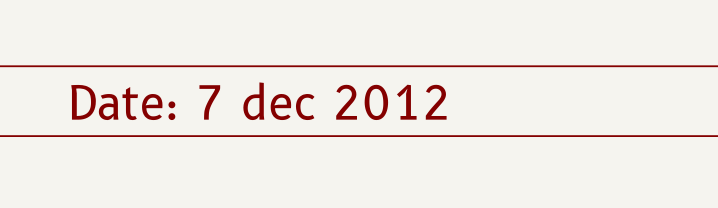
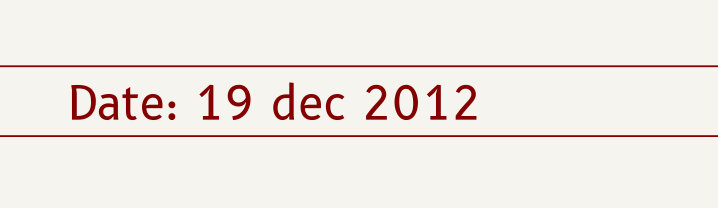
title block: Date: 7 dec 2012 (258, 101) -> Date: 19 dec 2012 (273, 101)

